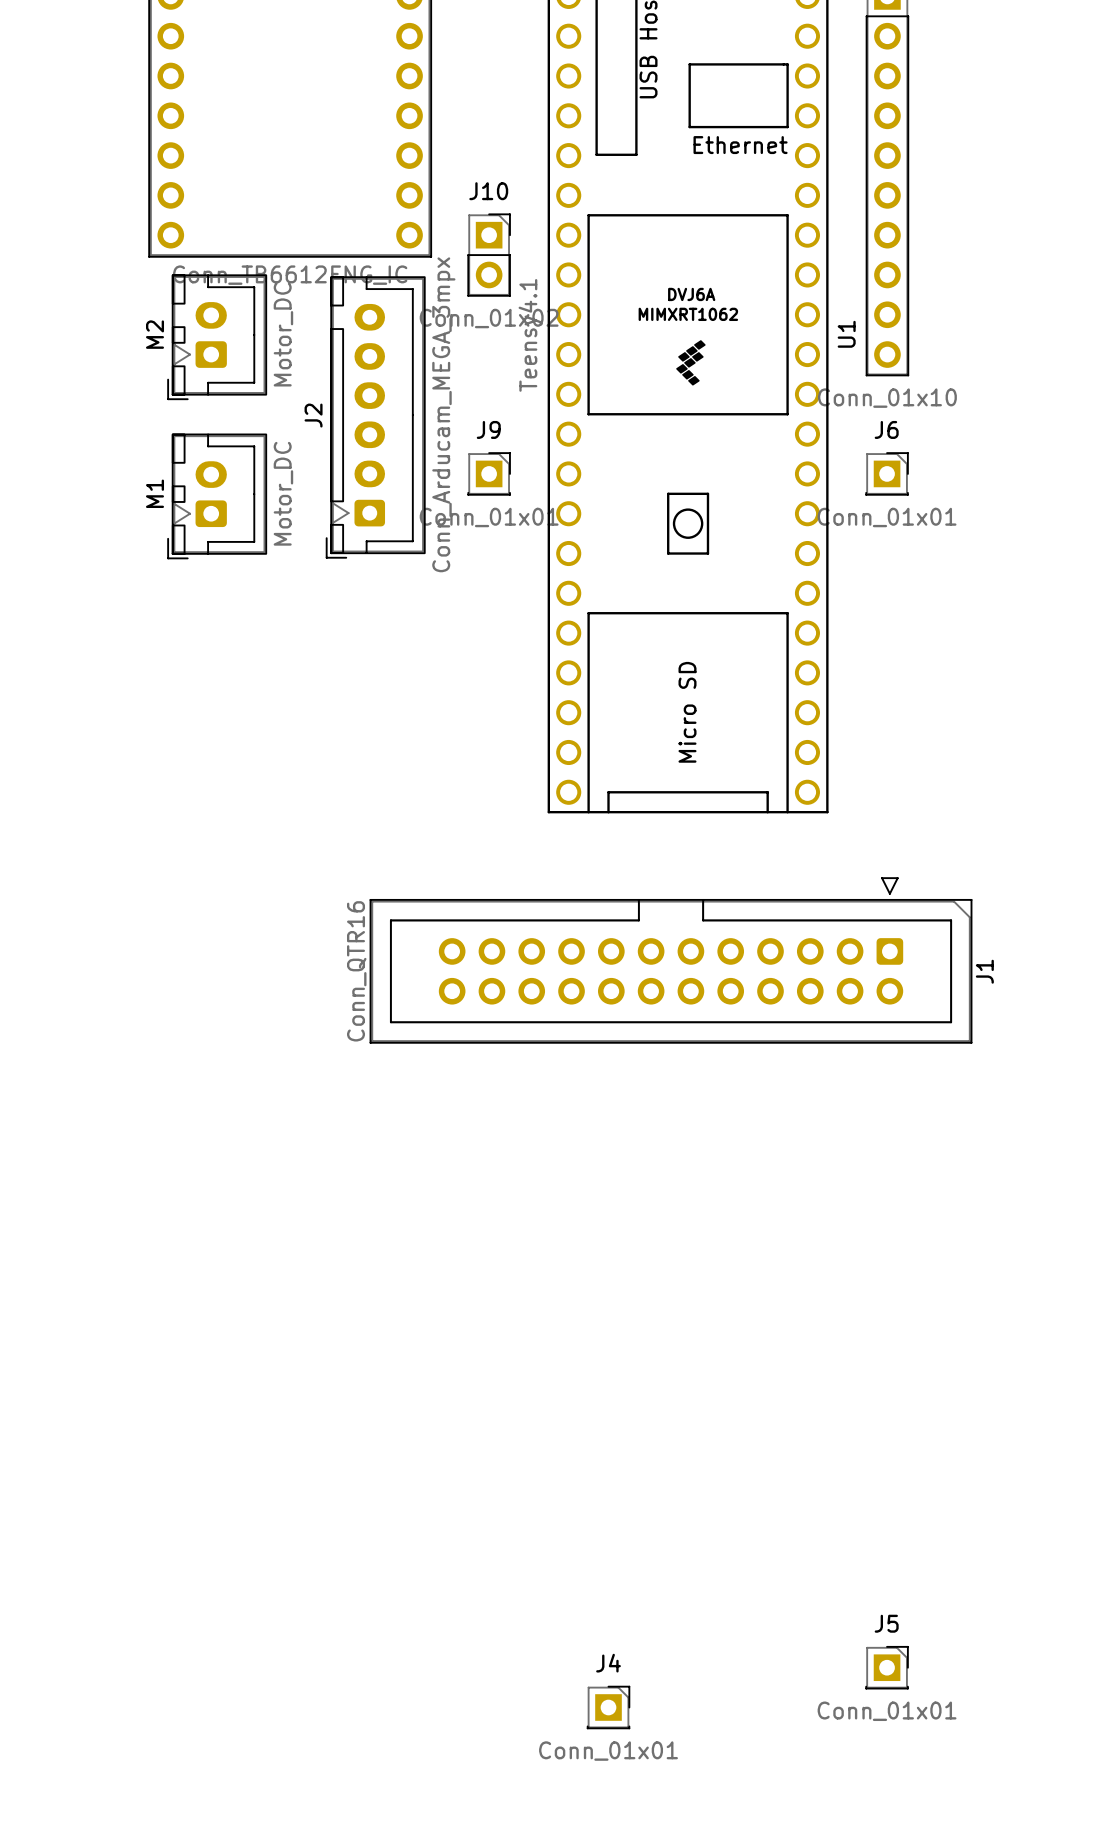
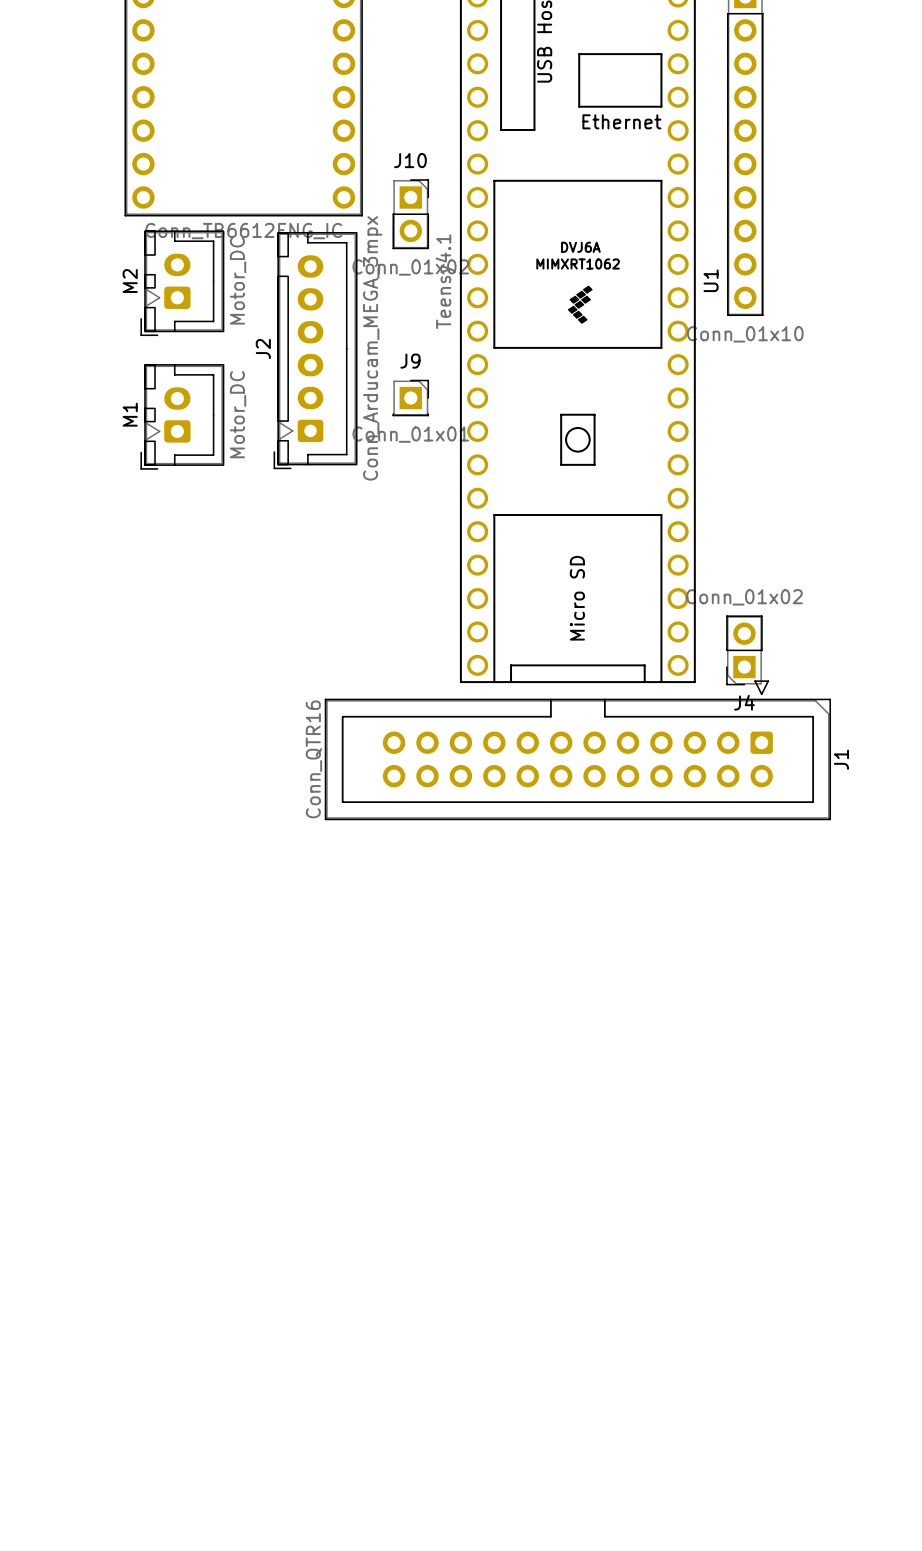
J6: Conn_01x01 (887, 473) -> none
J1 position: (671, 960) -> (577, 750)
J4 name position: J4 (608, 1663) -> J4 (744, 702)
J5: Conn_01x01 (887, 1667) -> none
J4 footprint: [586, 1685, 631, 1730] -> [726, 615, 763, 686]
J4 value: Conn_01x01 (608, 1751) -> Conn_01x02 (744, 597)

